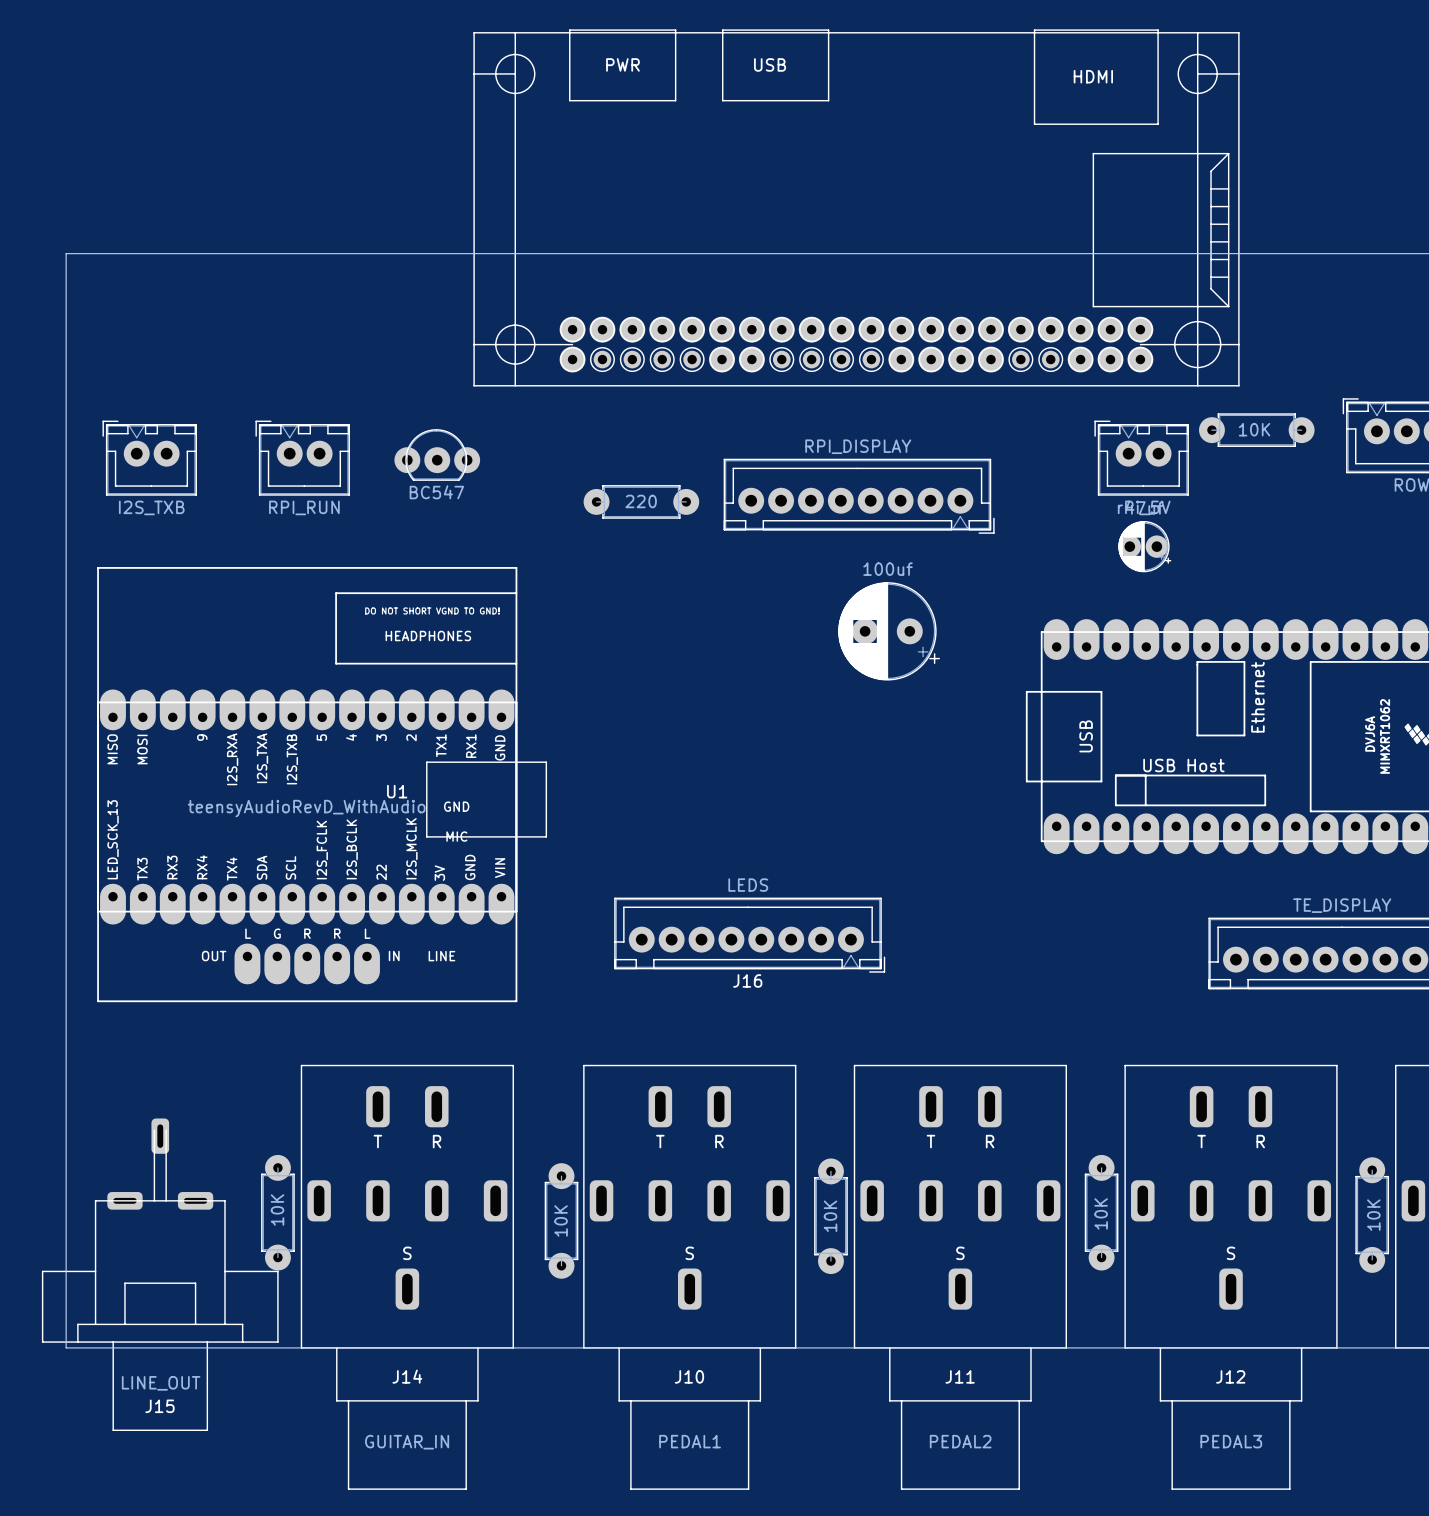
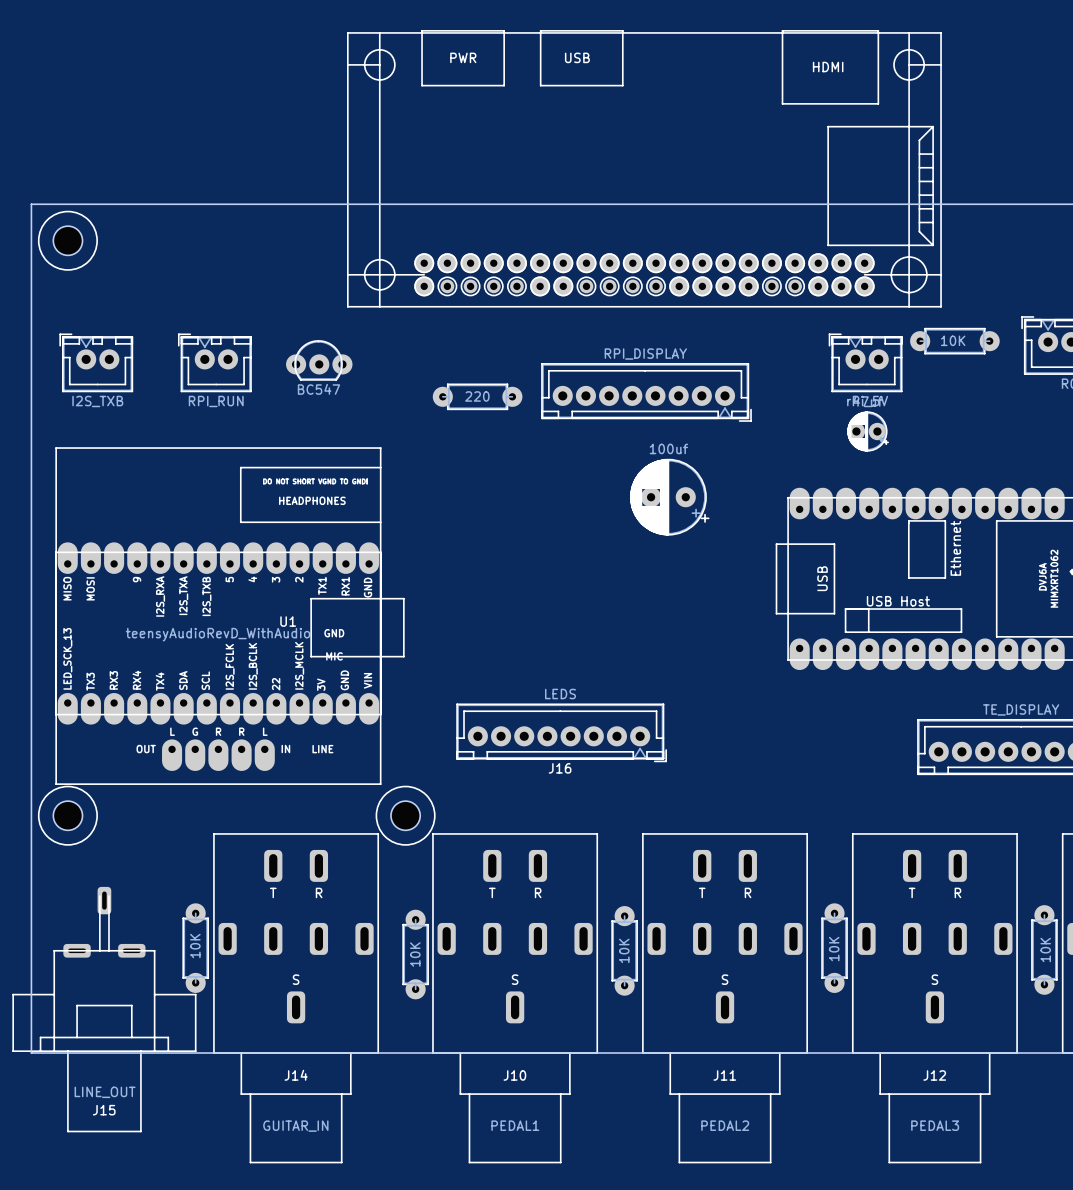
part: none -> (67, 240)
part: none -> (67, 815)
part: none -> (405, 815)
J15 footprint: [41, 1118, 279, 1431] -> [12, 886, 197, 1133]

